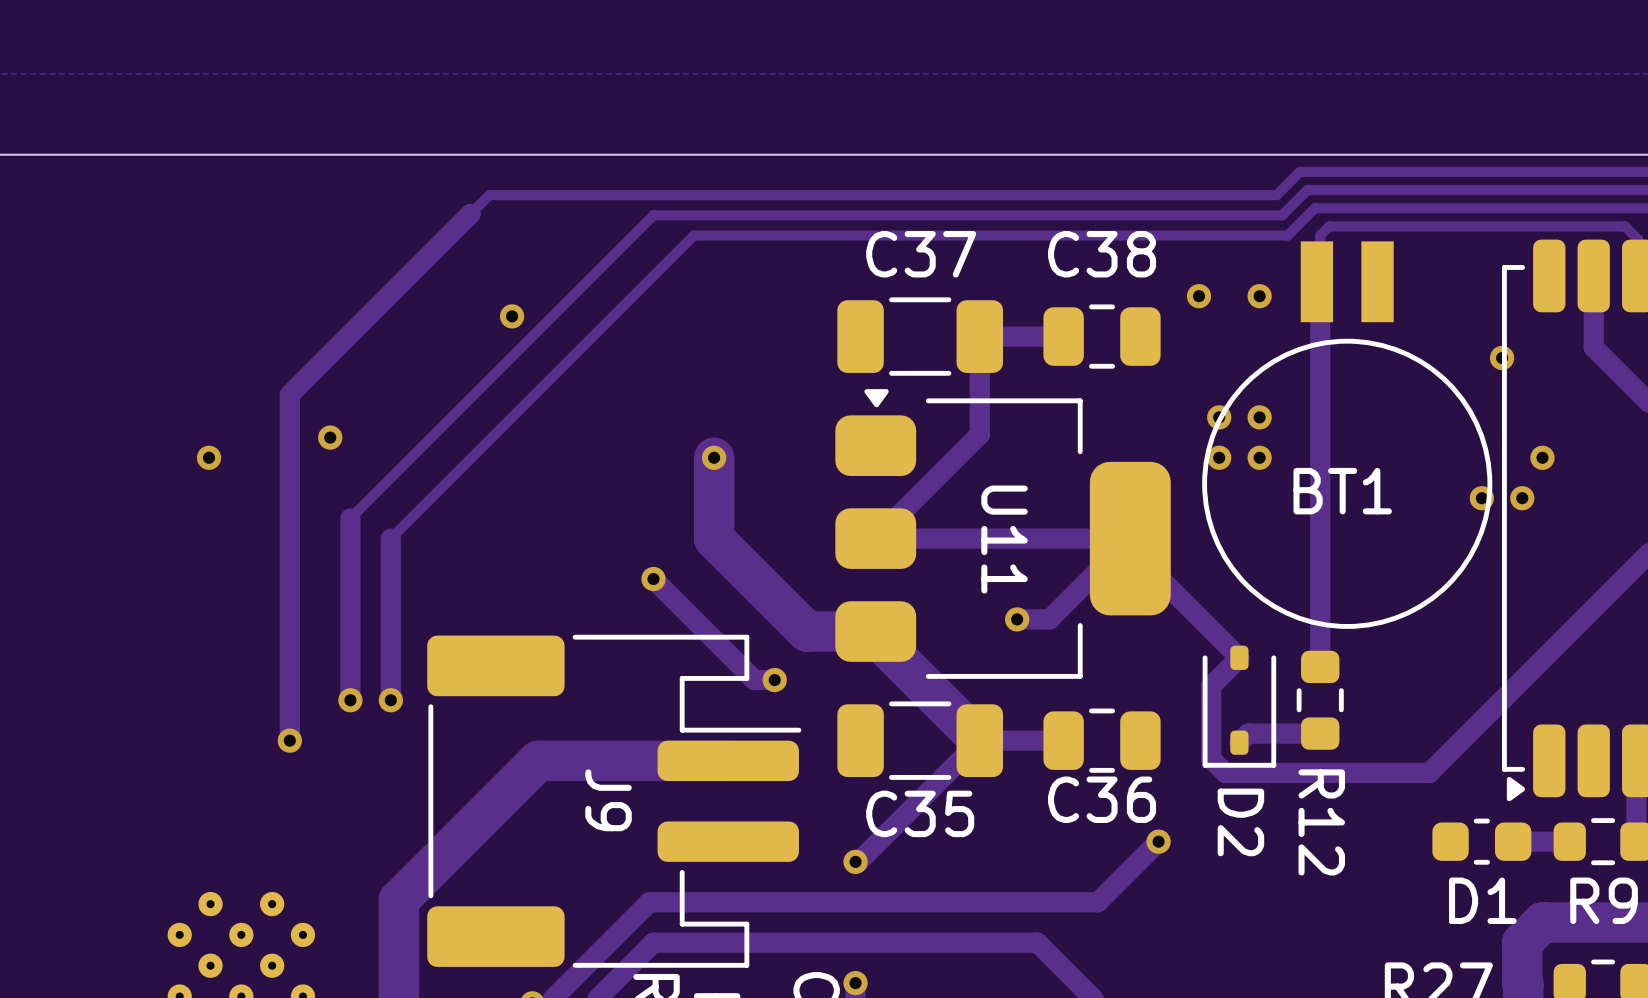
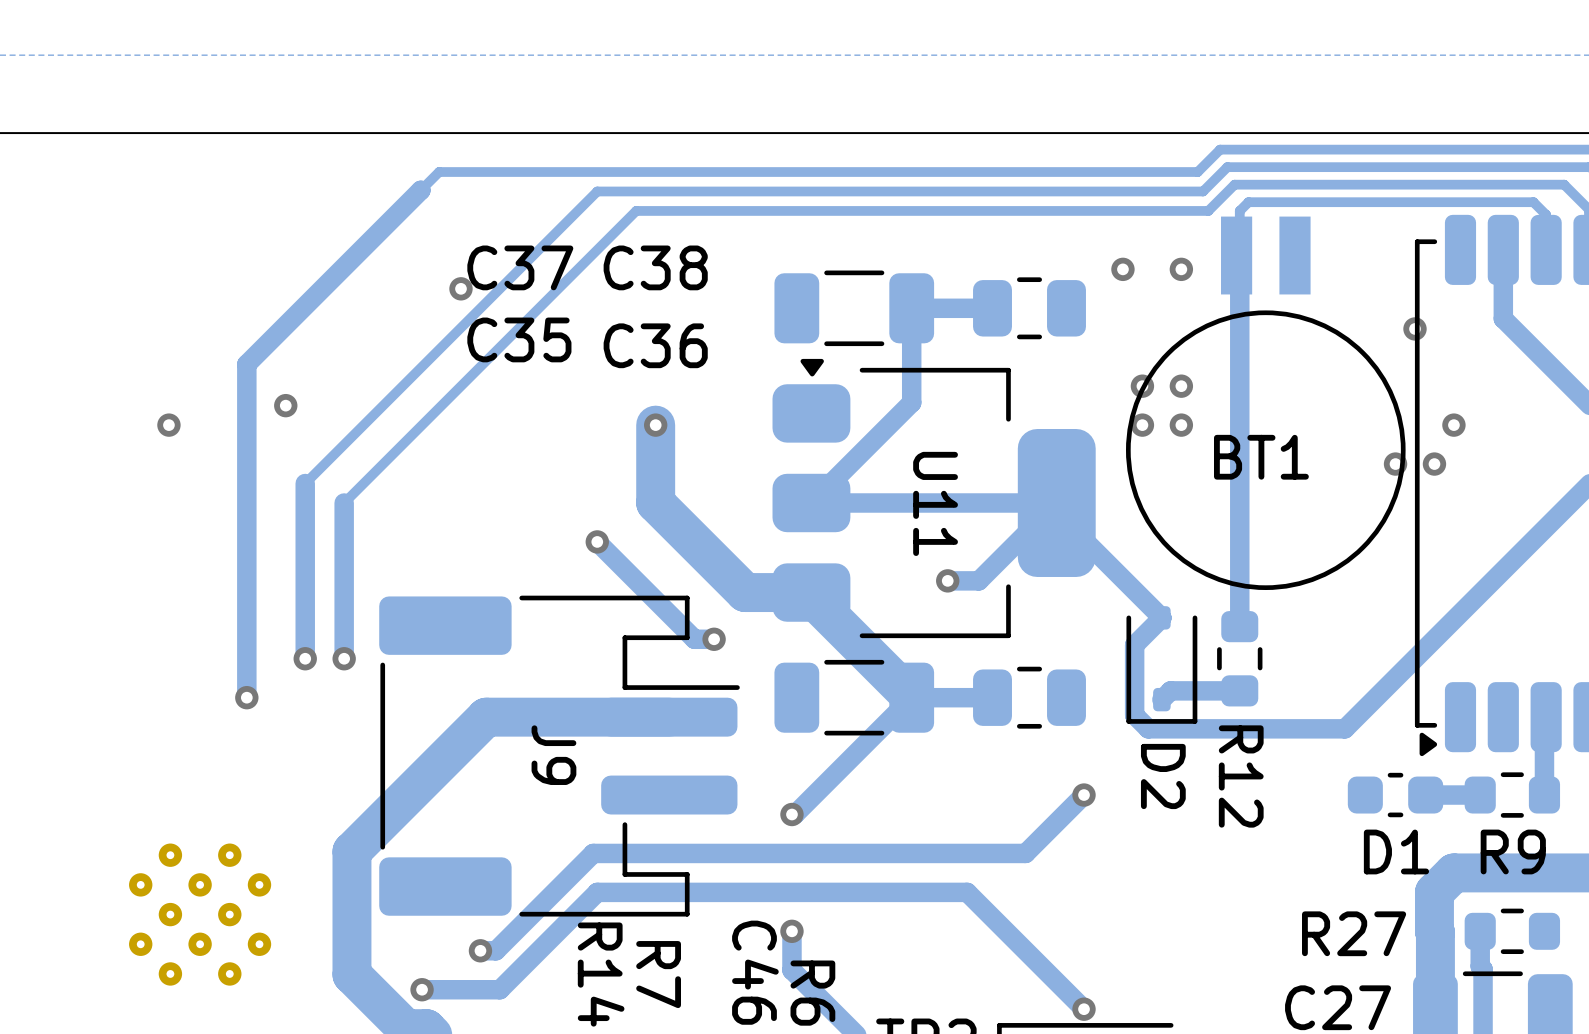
C37 name position: C37 (921, 254) -> C37 (520, 267)
C38 name position: C38 (1102, 254) -> C38 (655, 267)
C36 name position: C36 (1102, 799) -> C36 (655, 345)
C35 name position: C35 (920, 813) -> C35 (519, 339)

